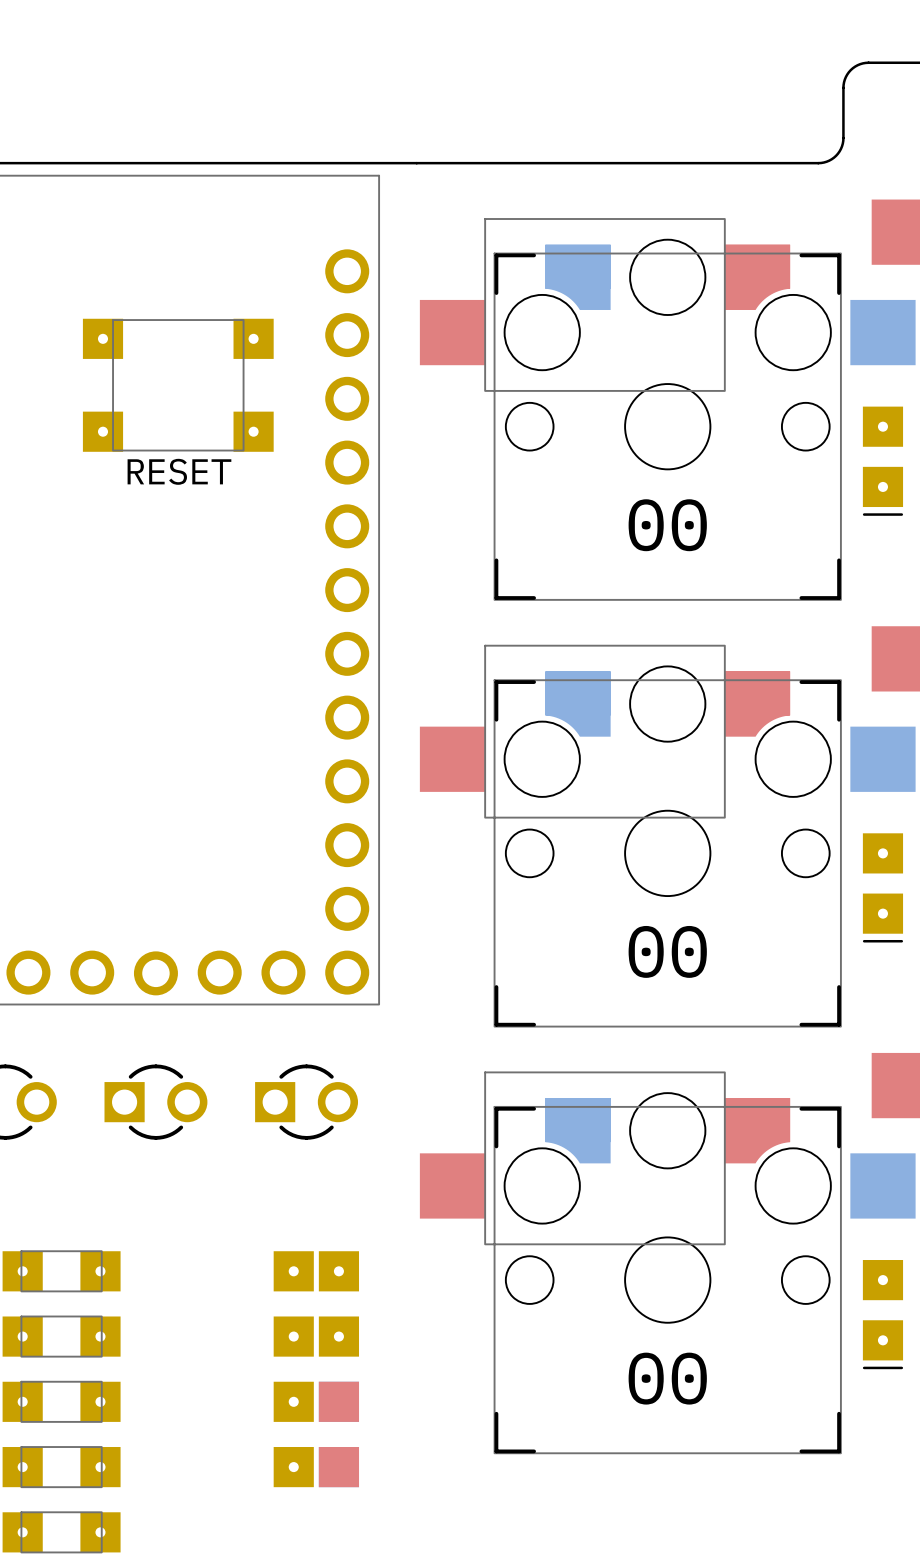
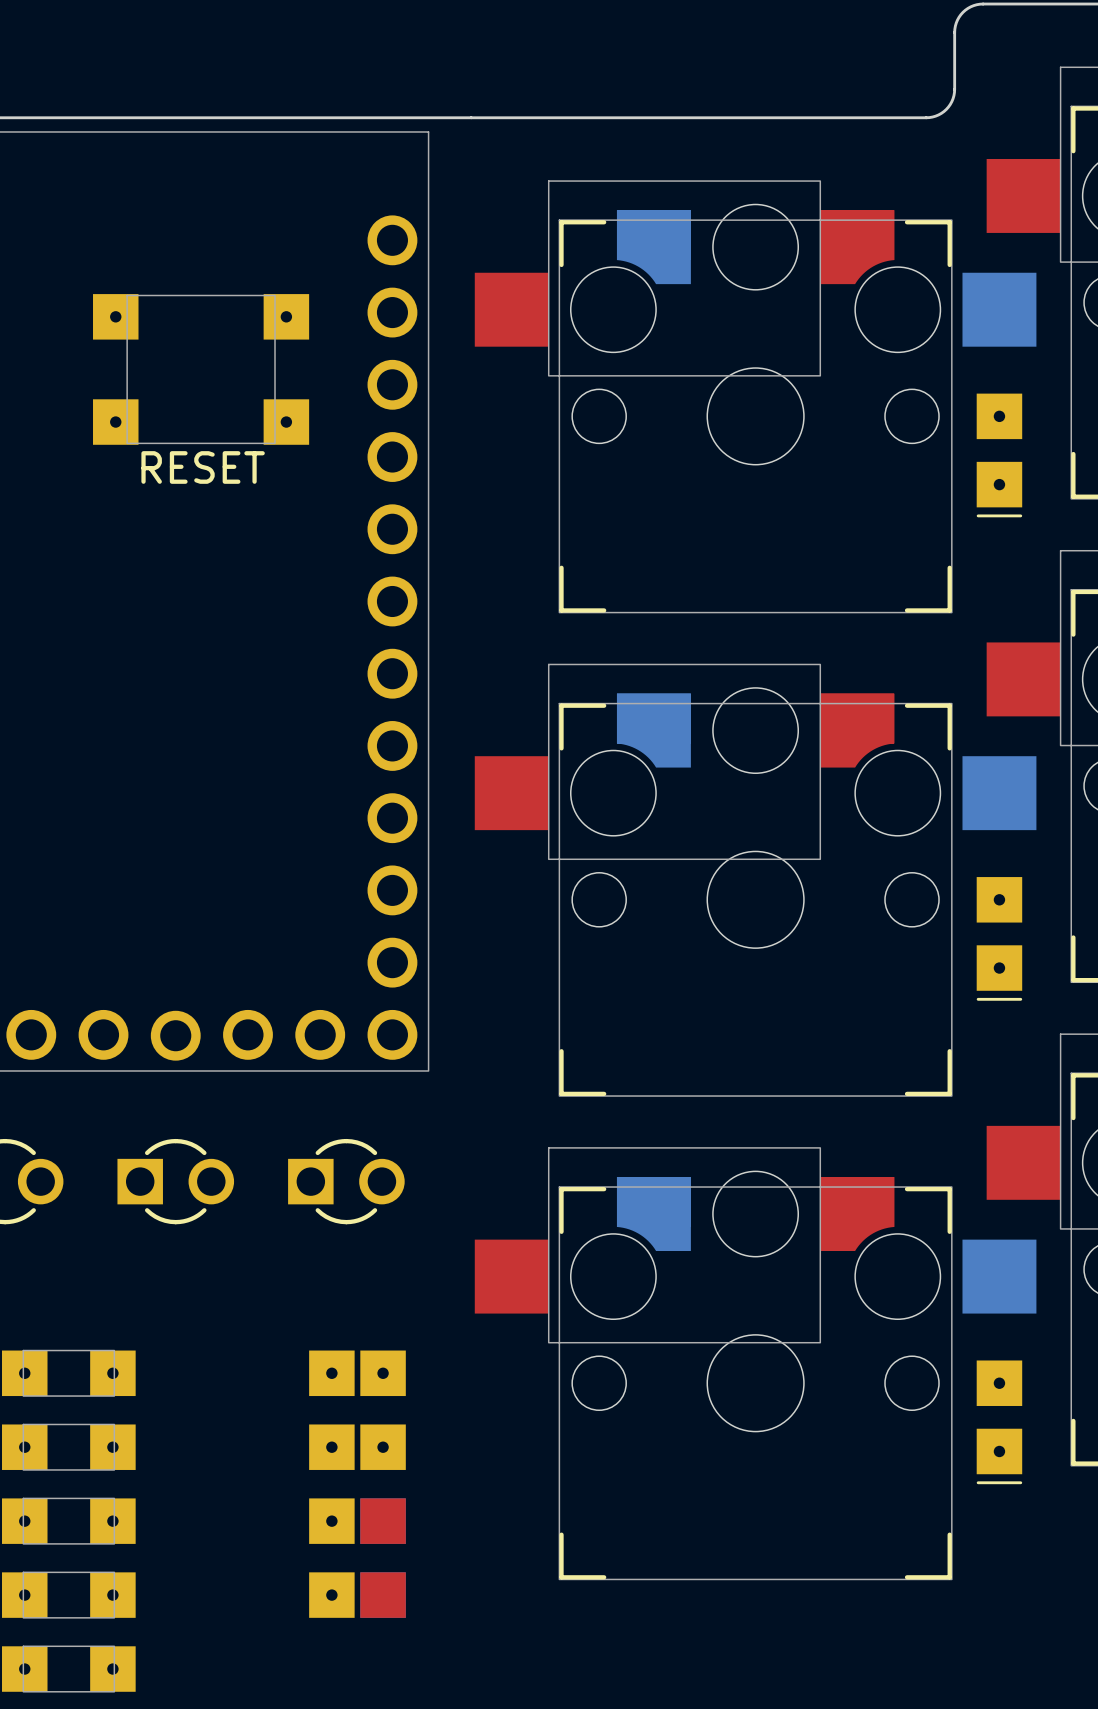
part text: 00 (667, 525) -> none
part text: 00 (667, 951) -> none
part text: 00 (667, 1378) -> none

